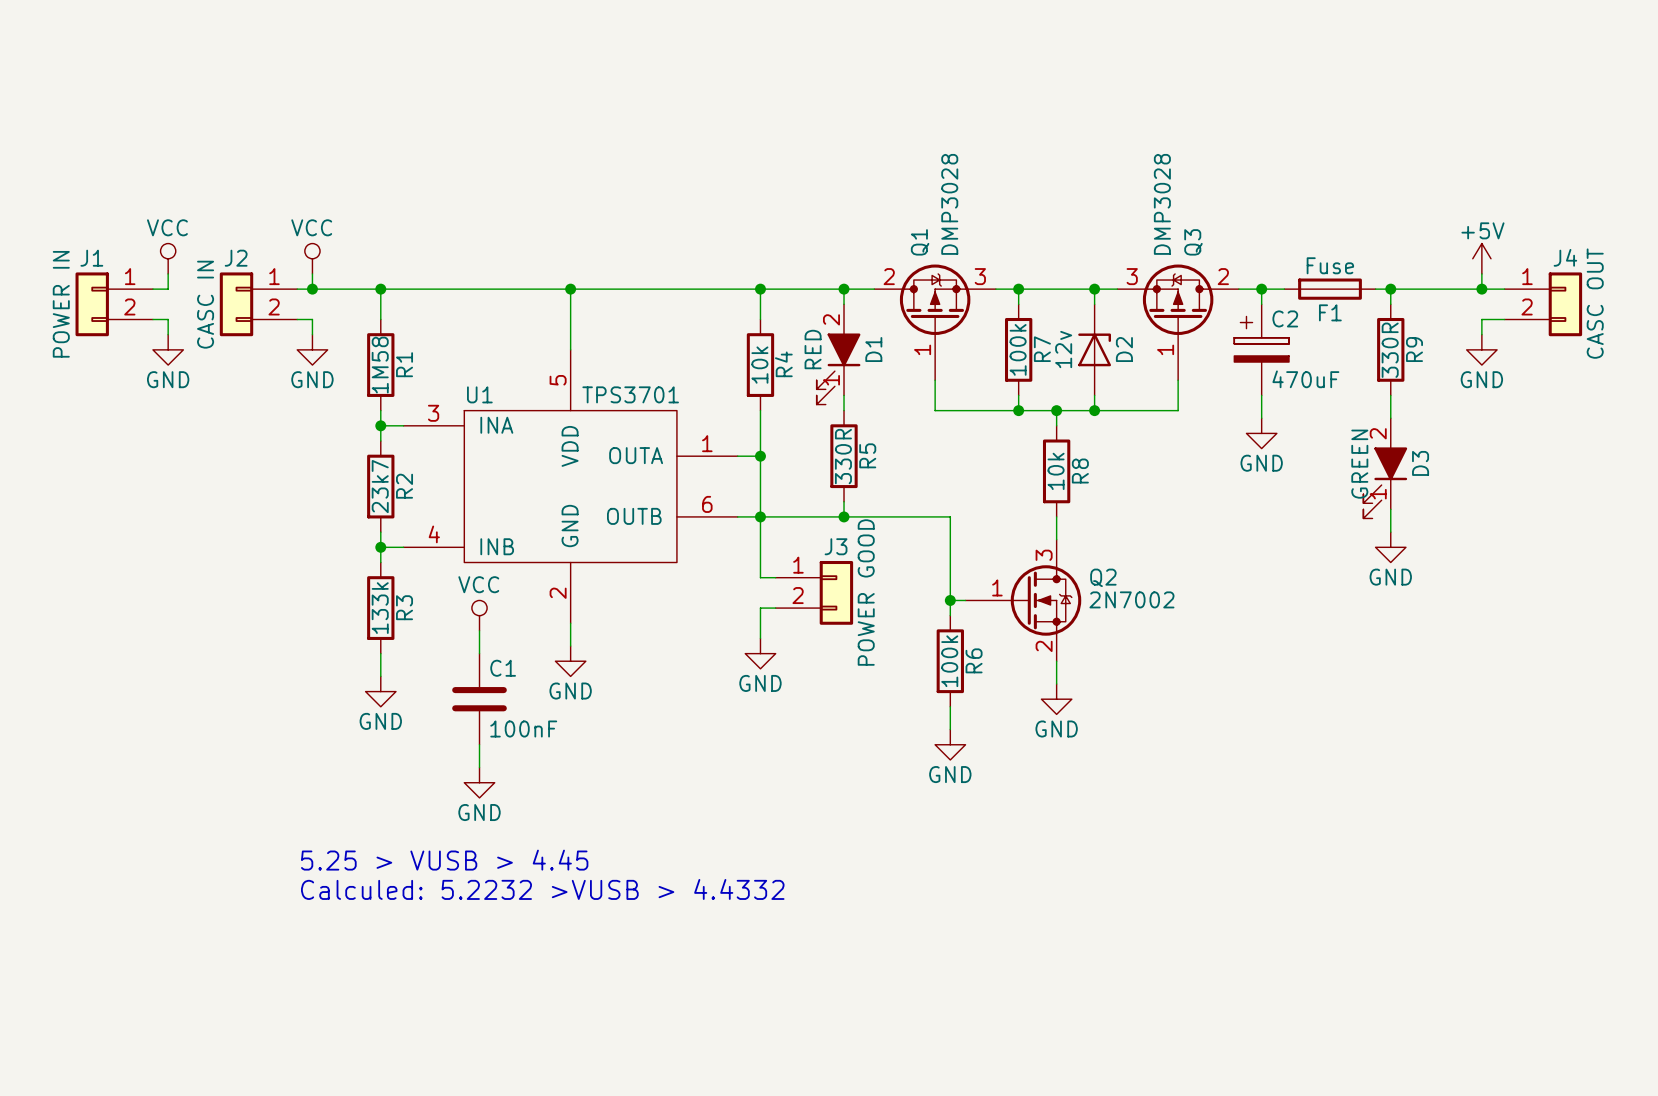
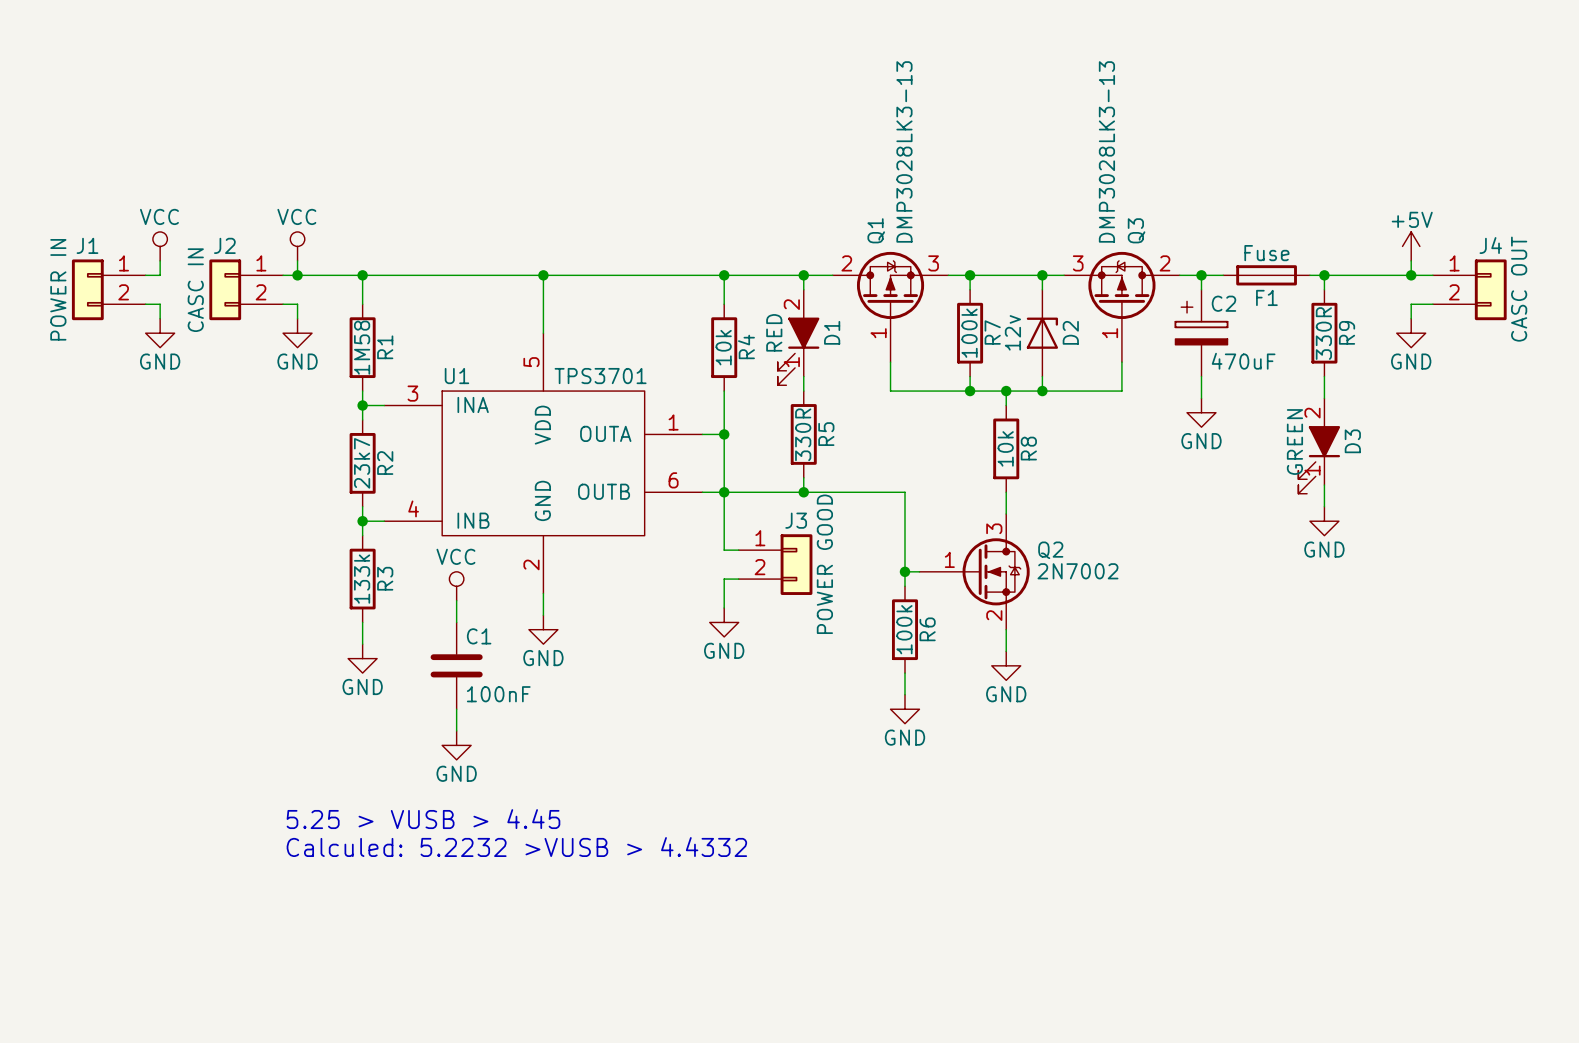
Q1 value: DMP3028 (949, 204) -> DMP3028LK3-13 (904, 151)
Q3 value: DMP3028 (1162, 204) -> DMP3028LK3-13 (1106, 151)

